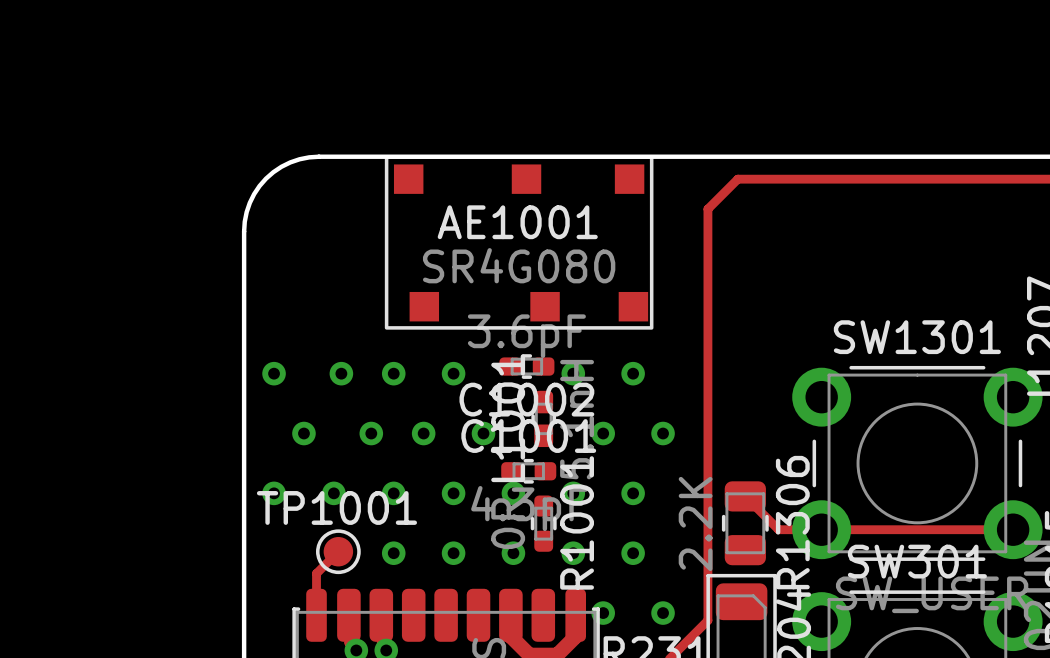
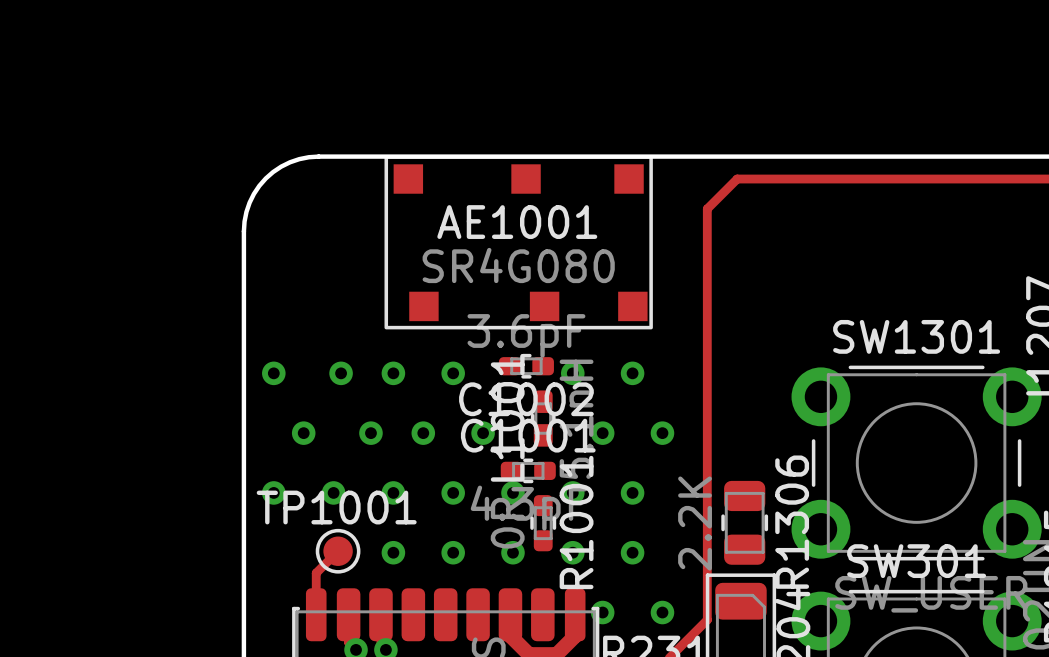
track: (745, 496) (778, 529) (1013, 529) -> none

